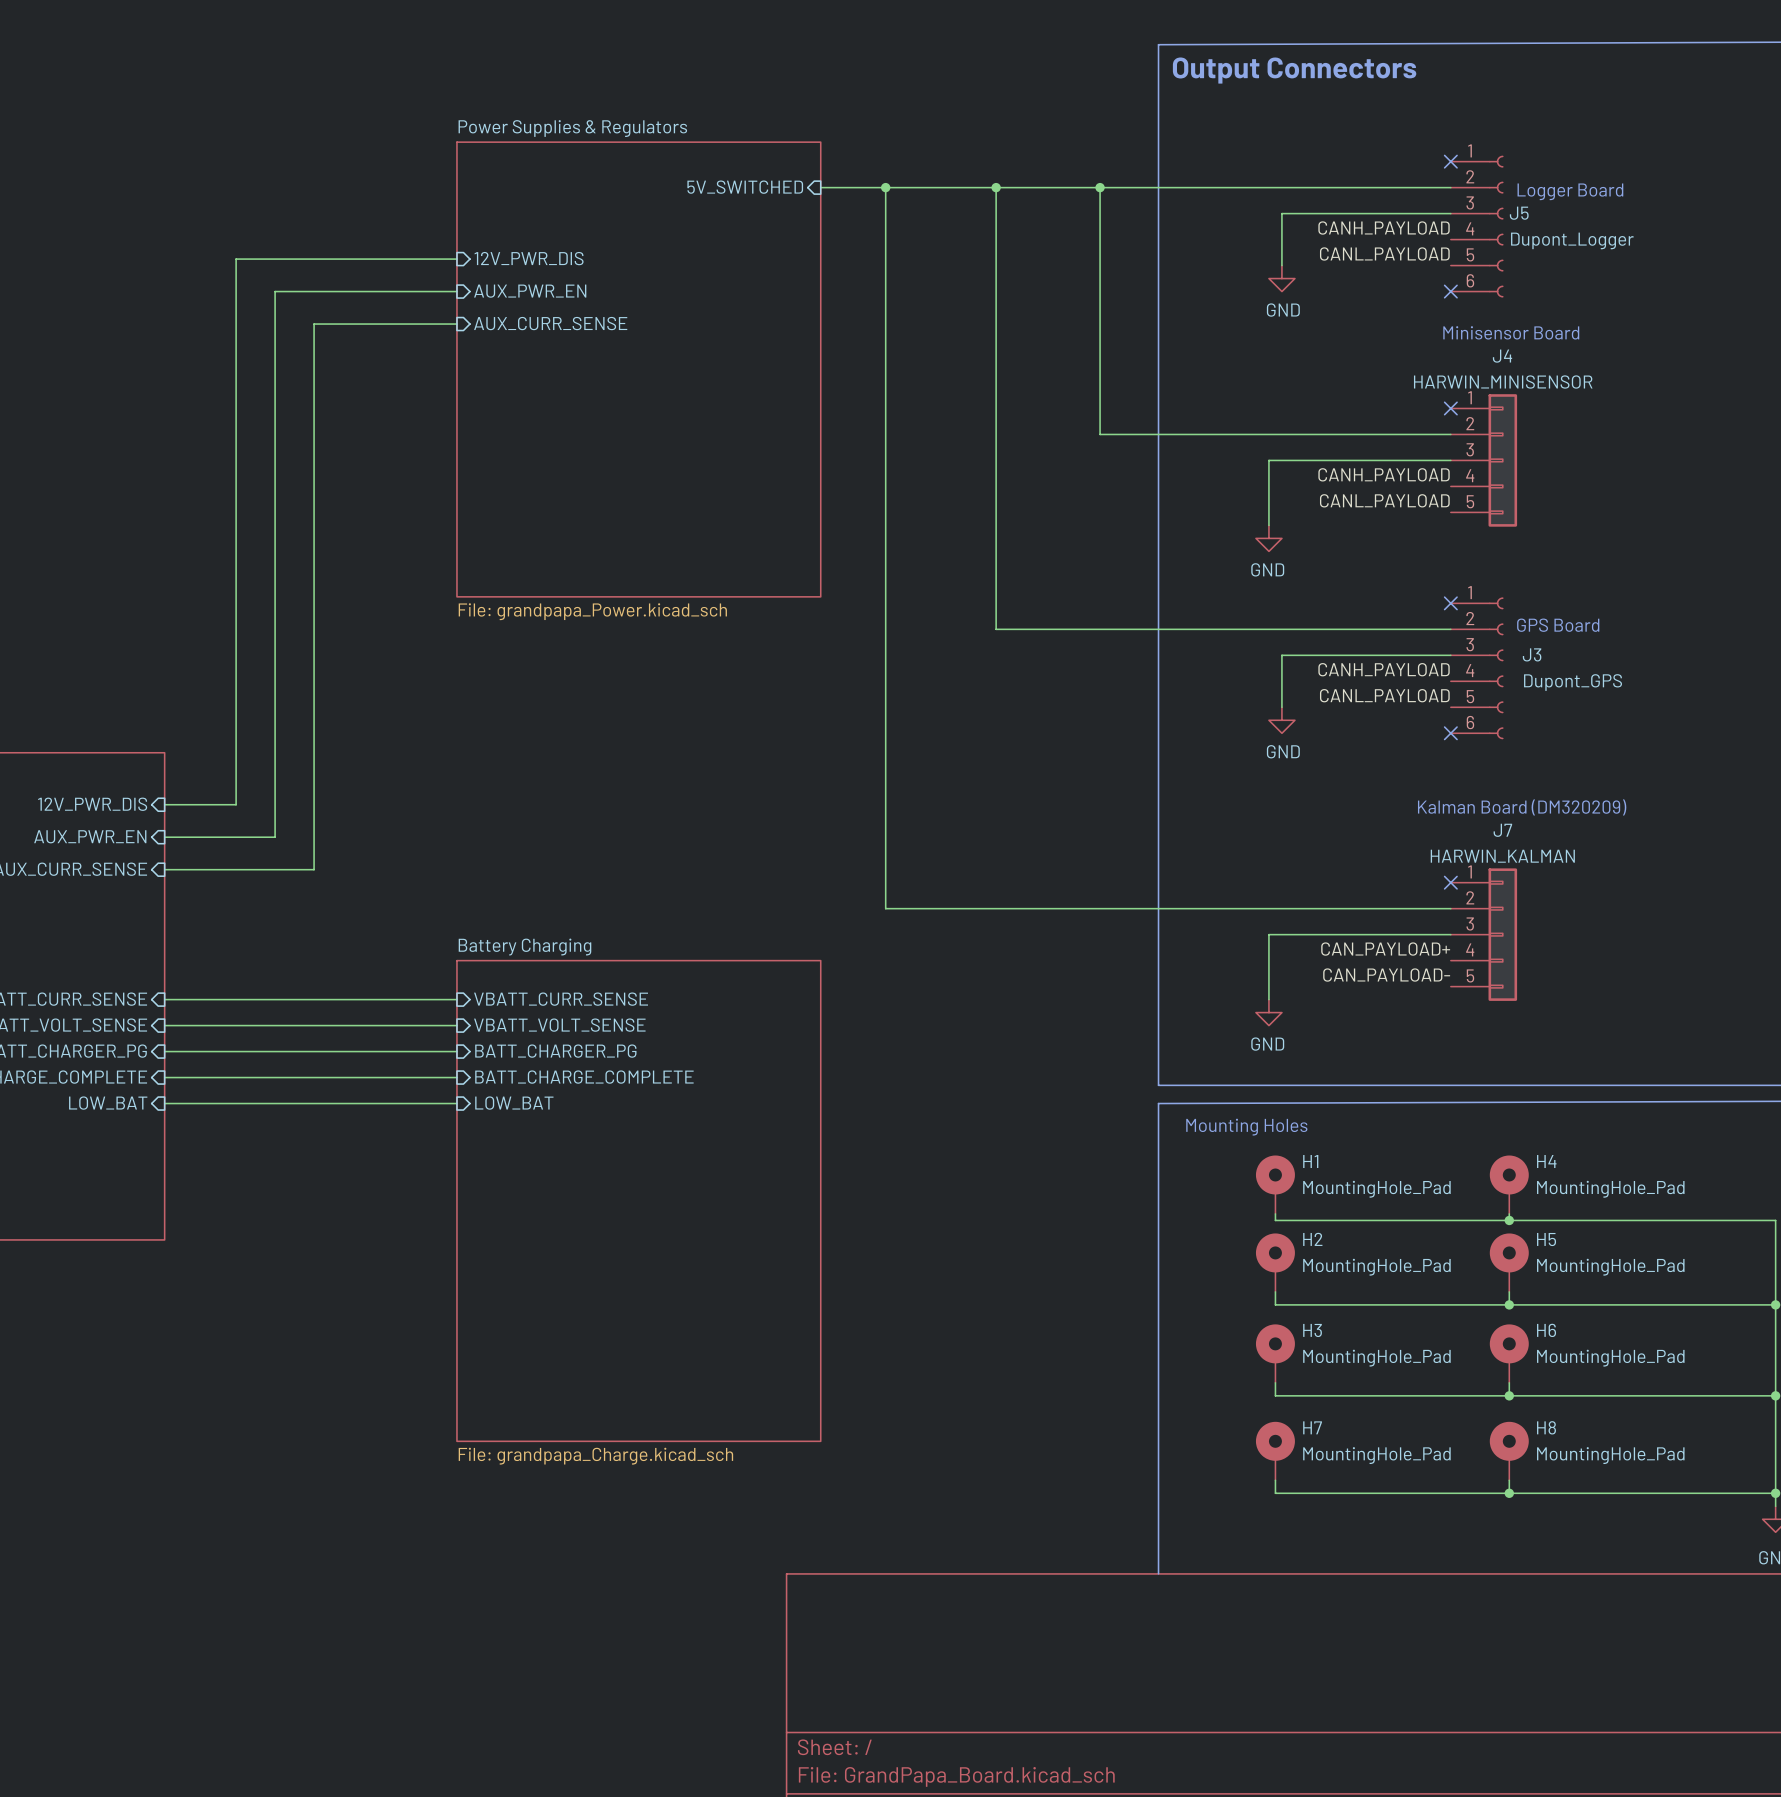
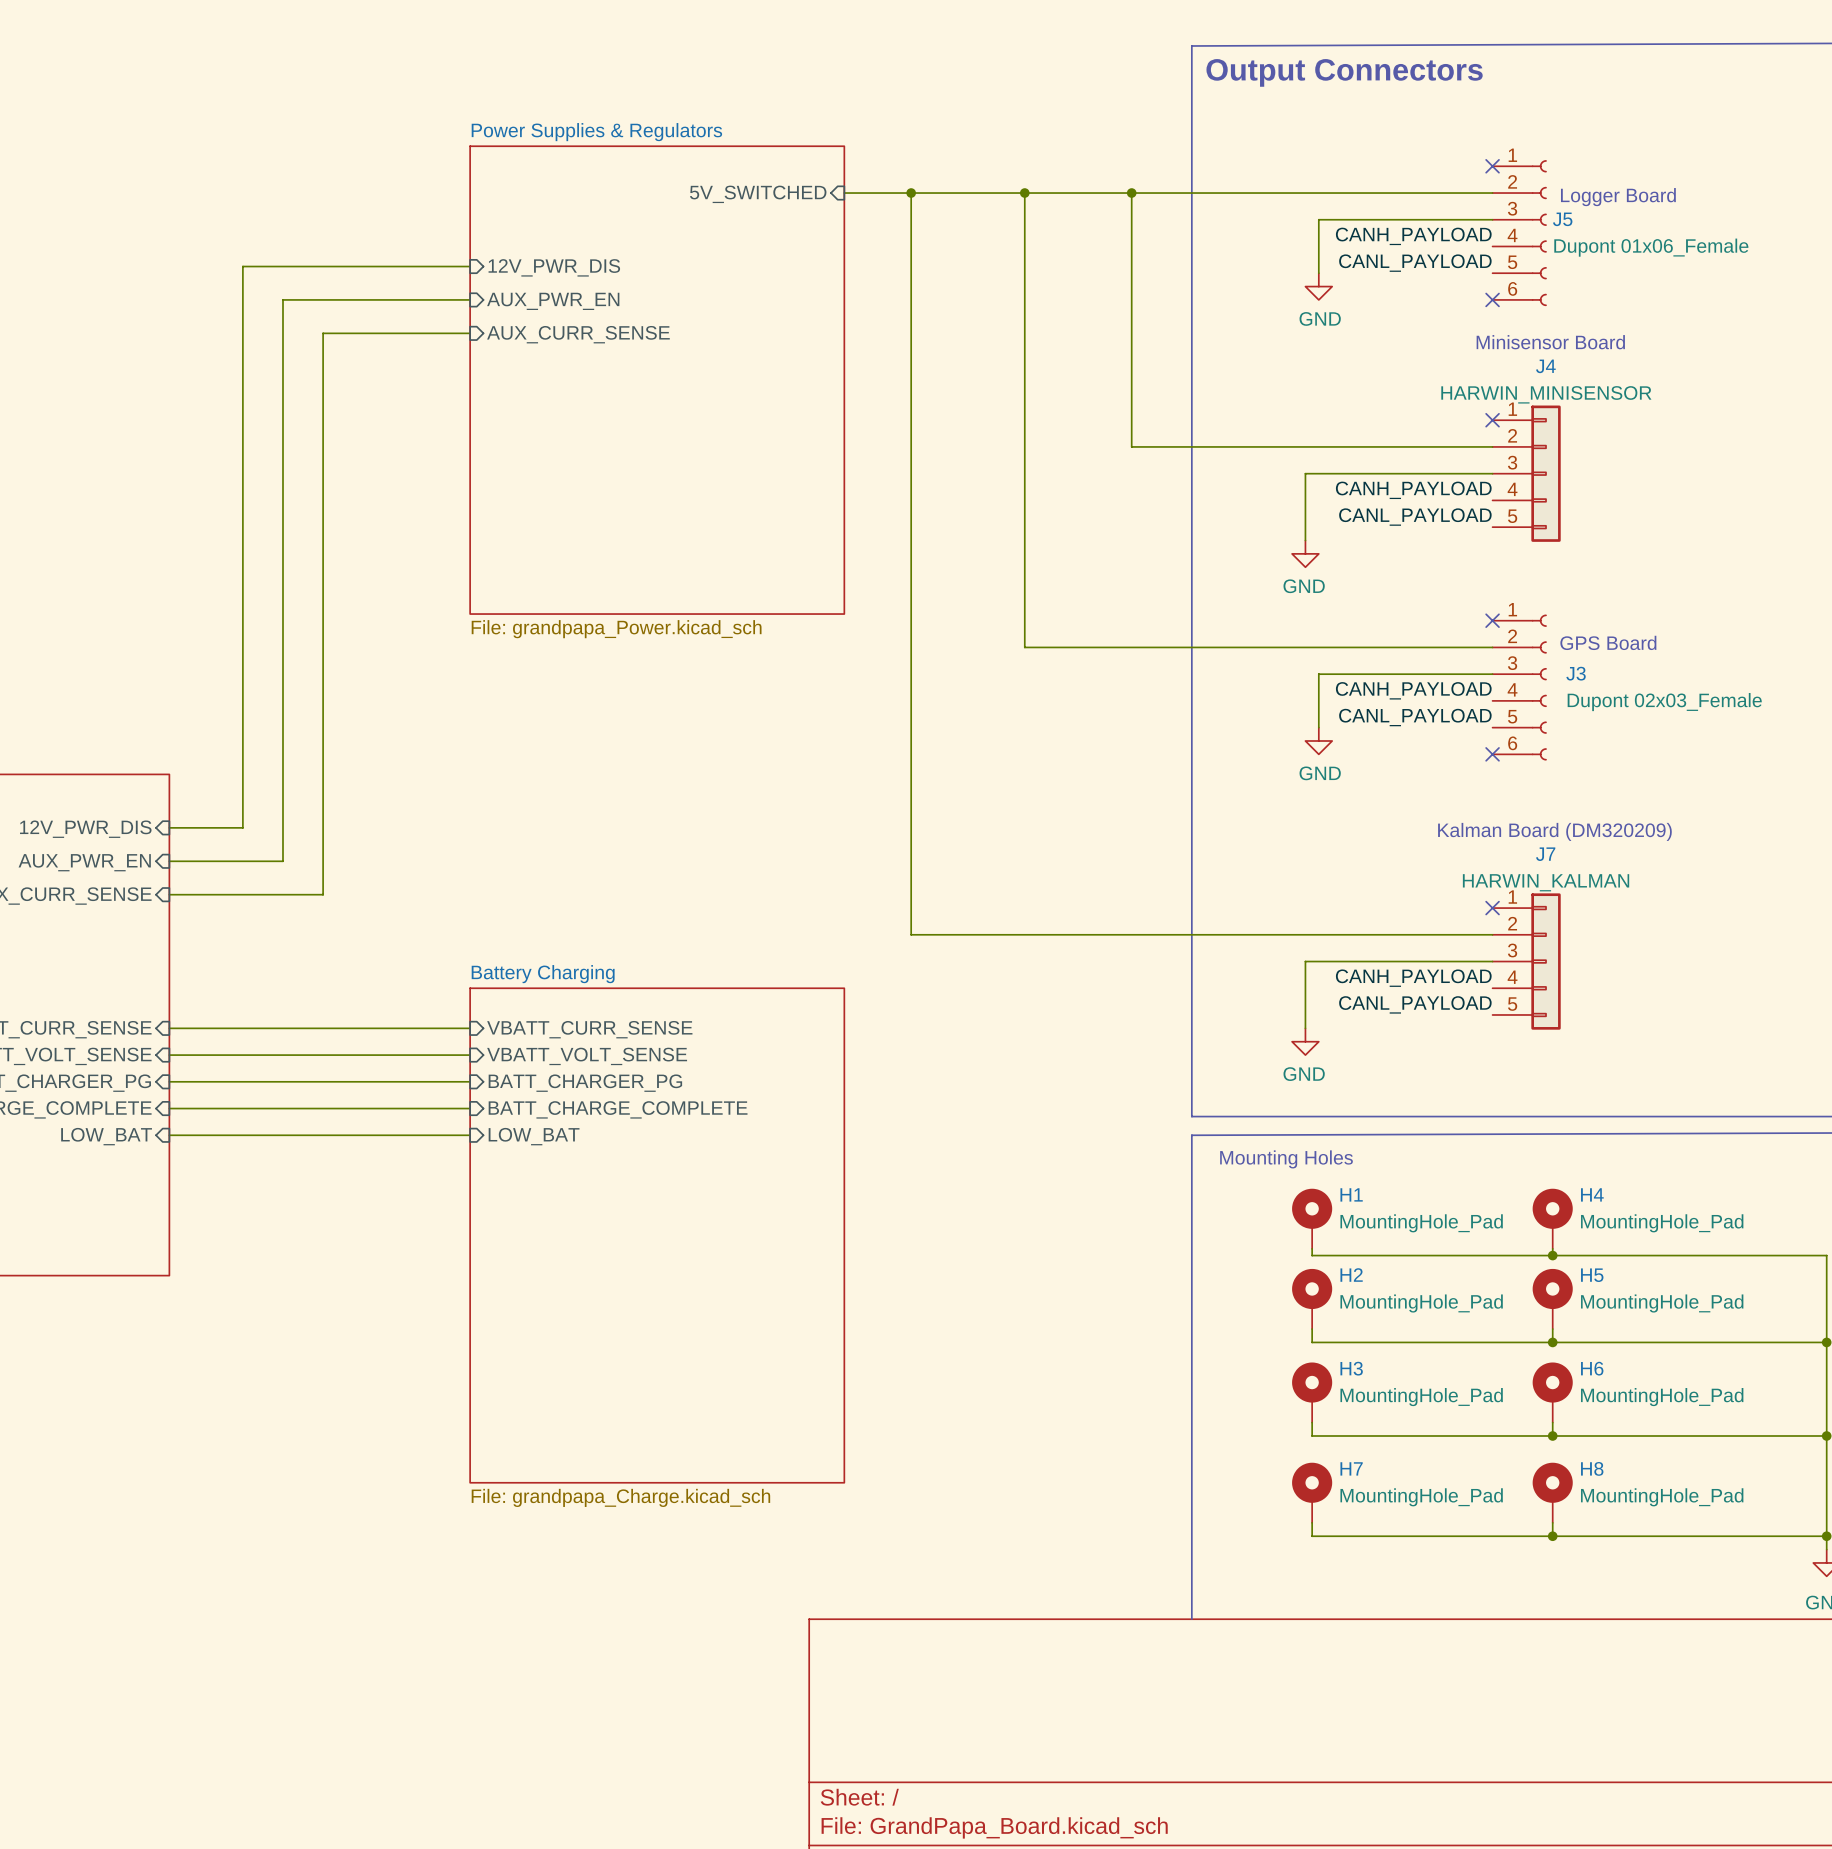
J5 value: Dupont_Logger (1572, 240) -> Dupont 01x06_Female (1651, 247)
J3 value: Dupont_GPS (1573, 682) -> Dupont 02x03_Female (1664, 702)
label: CAN_PAYLOAD+ (1385, 949) -> CANH_PAYLOAD (1413, 978)
label: CAN_PAYLOAD- (1386, 975) -> CANL_PAYLOAD (1415, 1004)

